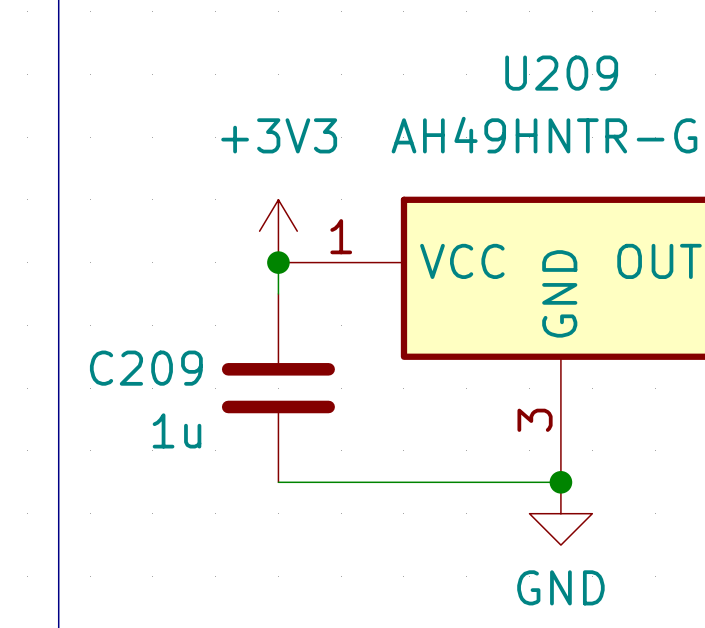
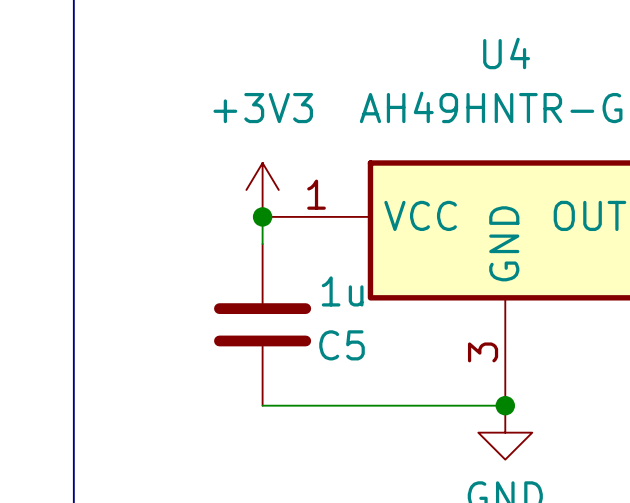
U209 name: U209 (561, 73) -> U4 (506, 53)
C209 name: C209 (146, 368) -> C5 (342, 345)
C209 value position: 1u (177, 430) -> 1u (342, 291)

